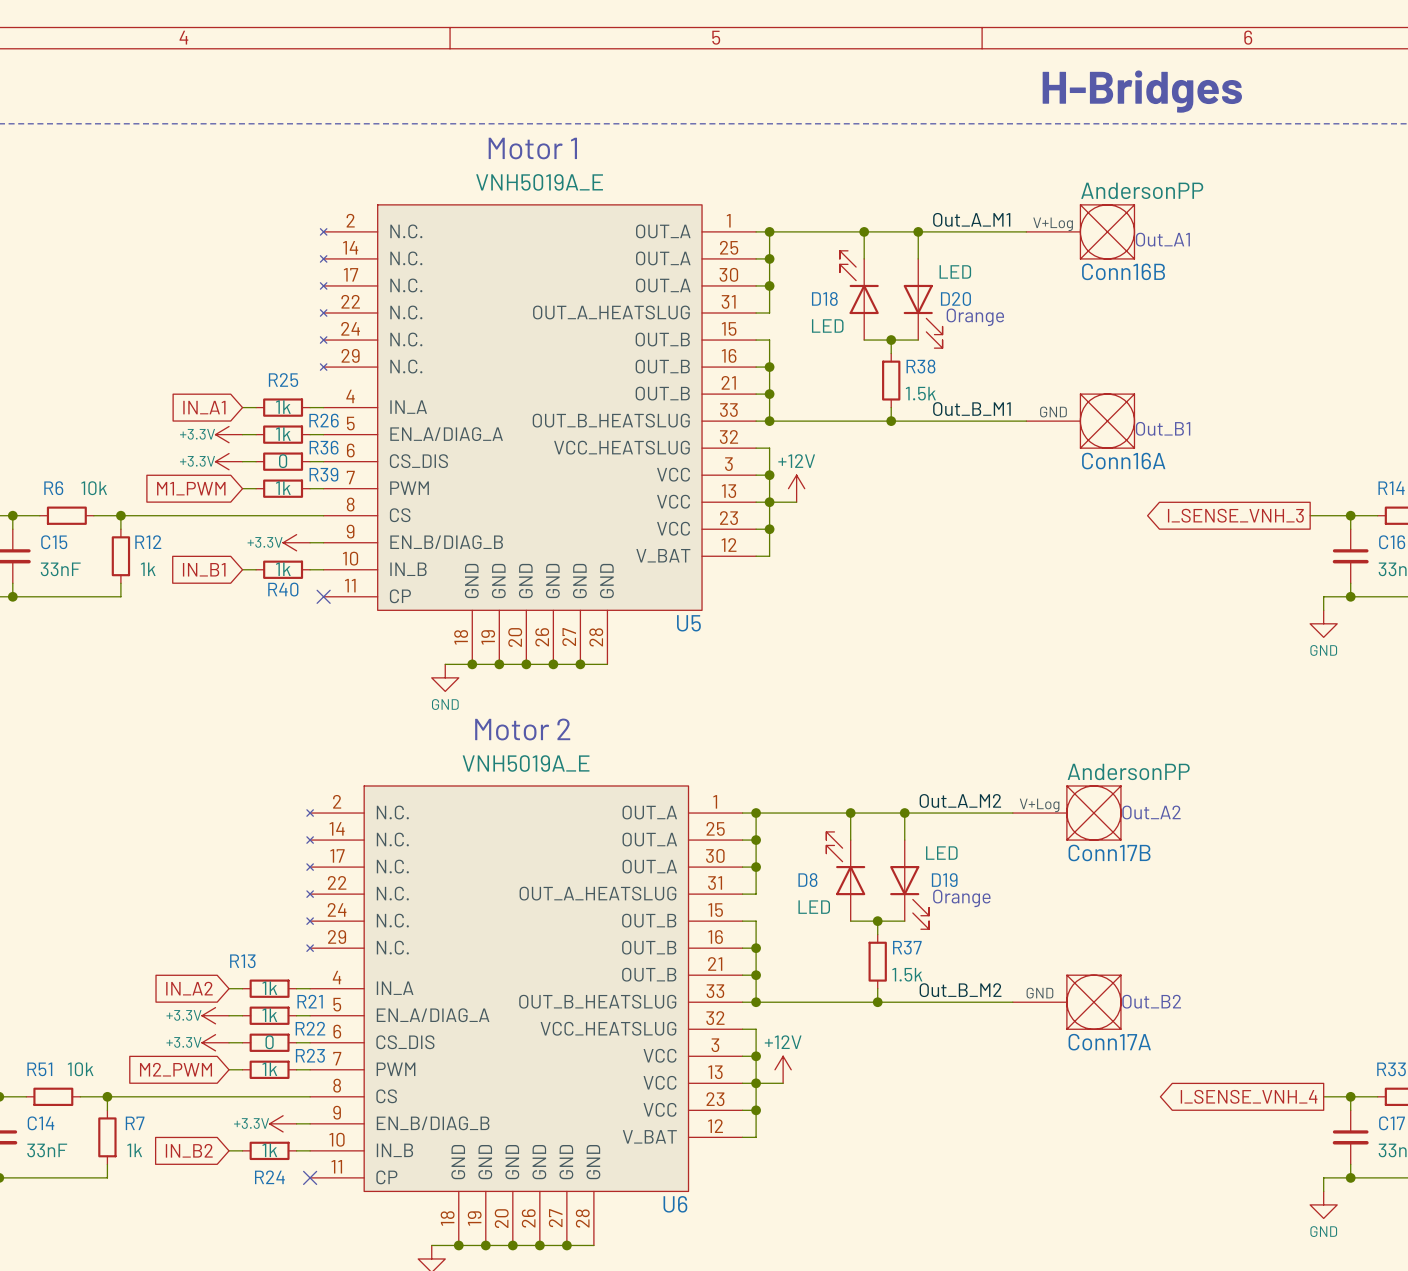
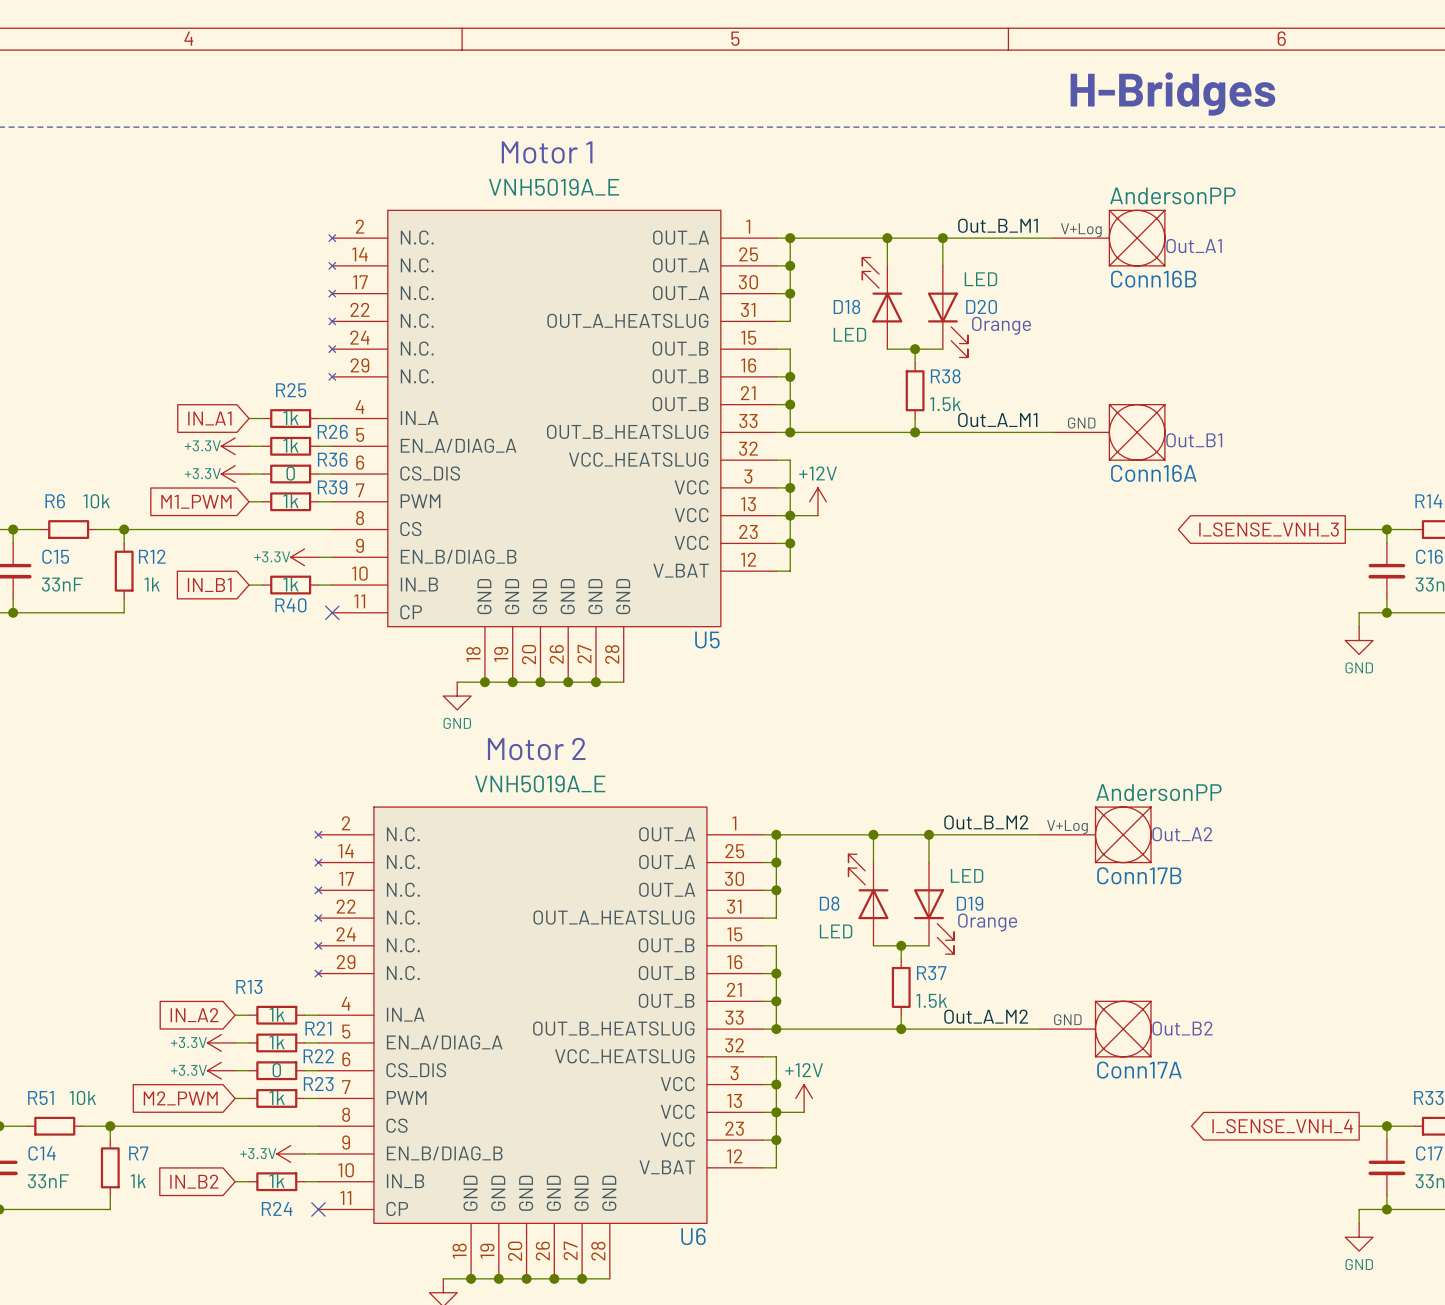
label: Out_A_M1 (971, 219) -> Out_B_M1 (997, 225)
label: Out_B_M1 (971, 409) -> Out_A_M1 (997, 420)
label: Out_A_M2 (960, 800) -> Out_B_M2 (986, 822)
label: Out_B_M2 (960, 990) -> Out_A_M2 (986, 1016)

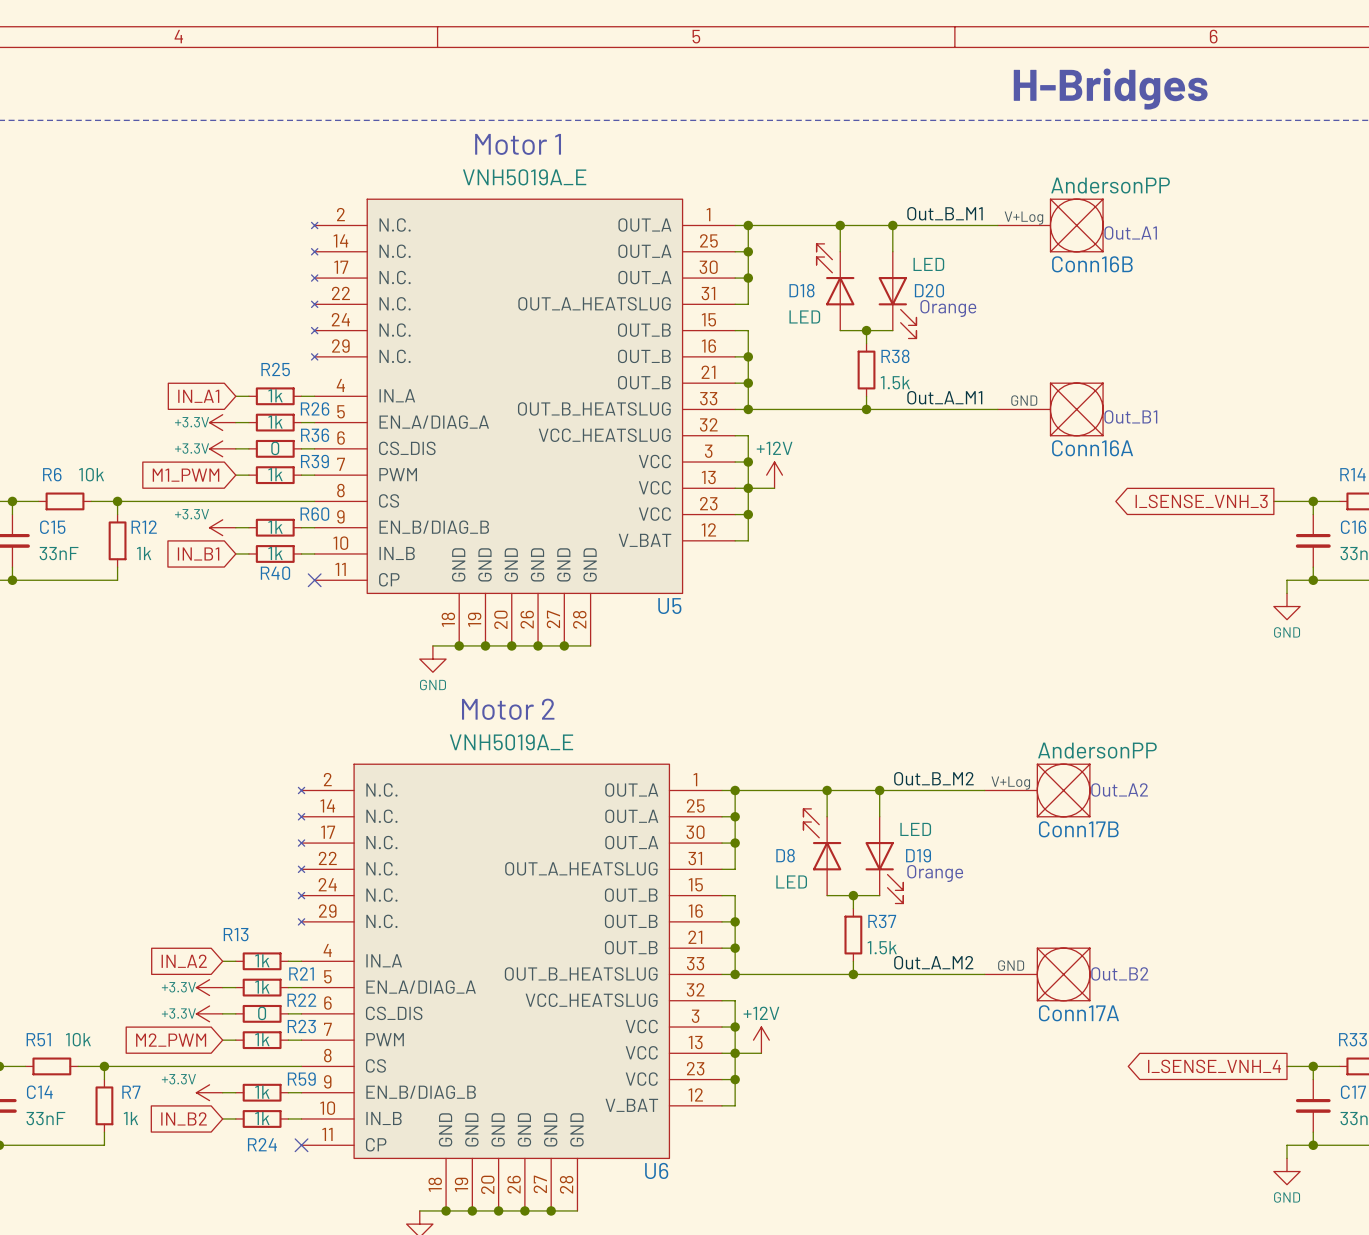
power symbol text position: +3.3V (272, 556) -> +3.3V (192, 514)
wire: none -> (235, 527) (248, 527)
R60: none -> 1k (275, 527)
power symbol position: +3.3V (304, 557) -> +3.3V (222, 527)
wire: none -> (222, 1092) (235, 1092)
power symbol text position: +3.3V (258, 1153) -> +3.3V (178, 1079)
R59: none -> 1k (262, 1092)
power symbol position: +3.3V (290, 1153) -> +3.3V (209, 1092)

